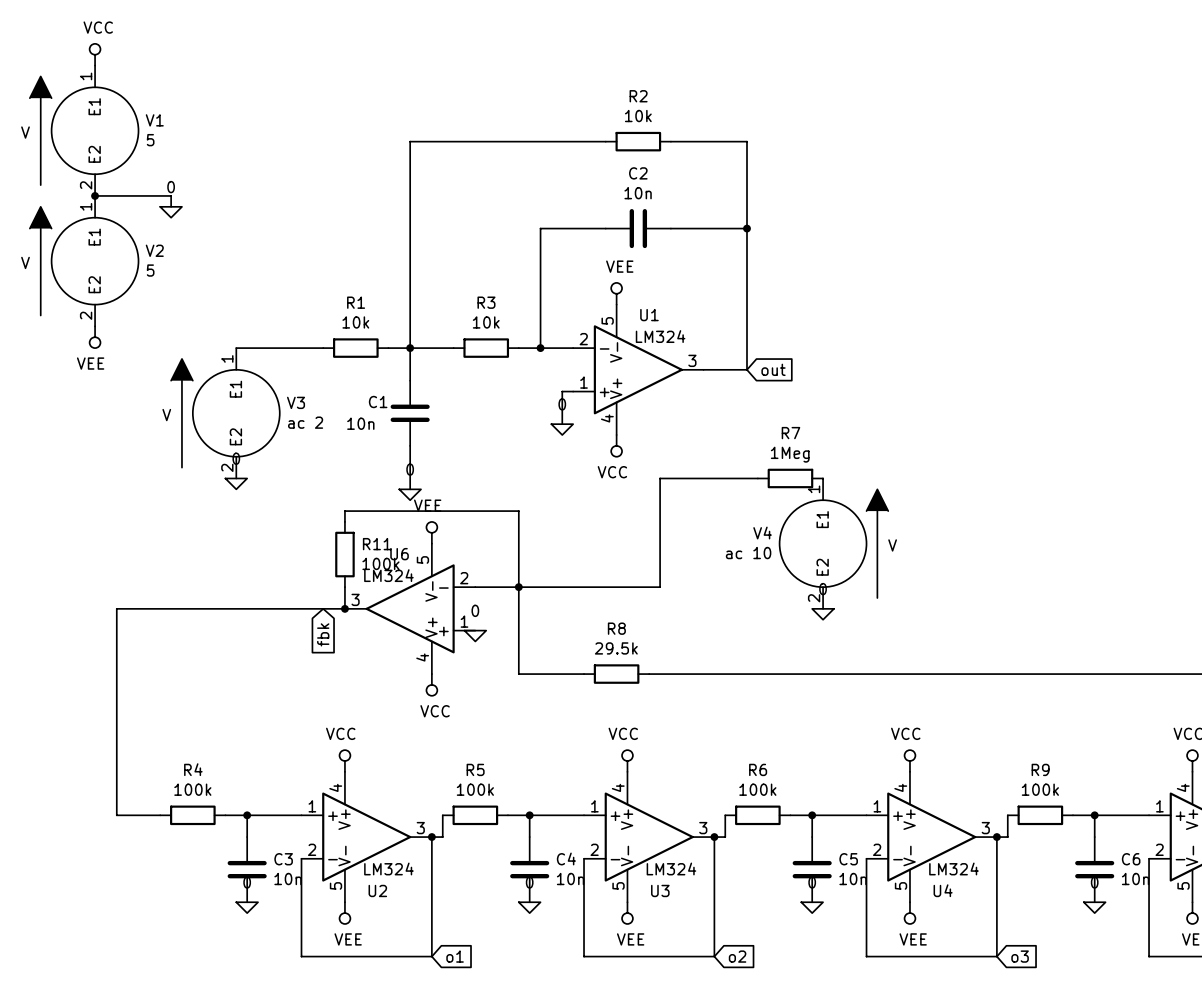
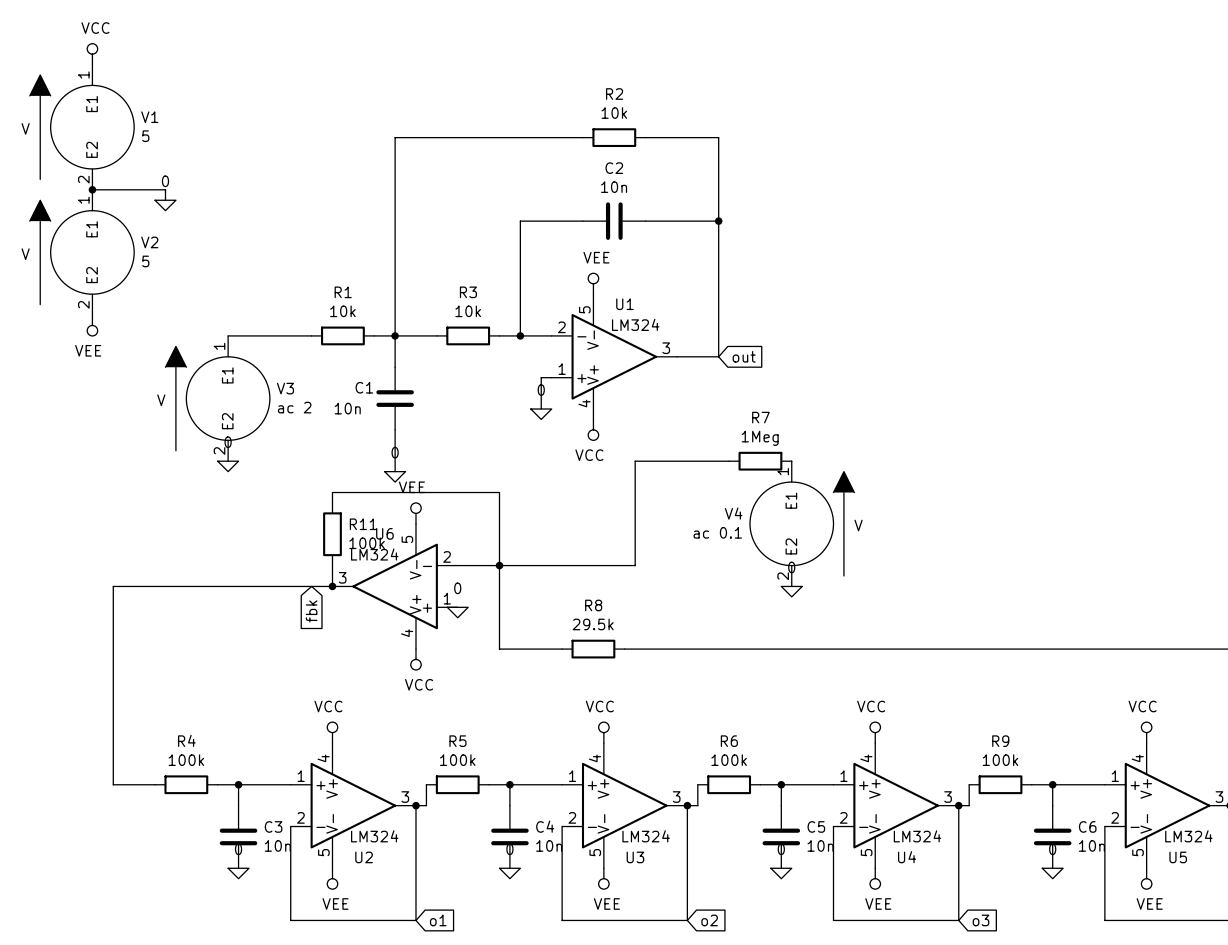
V4 value: ac 10 (748, 553) -> ac 0.1 (717, 532)

